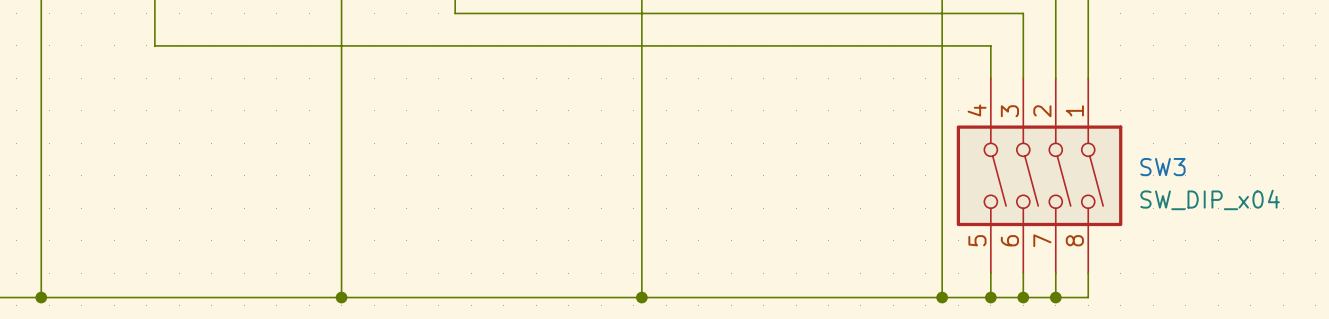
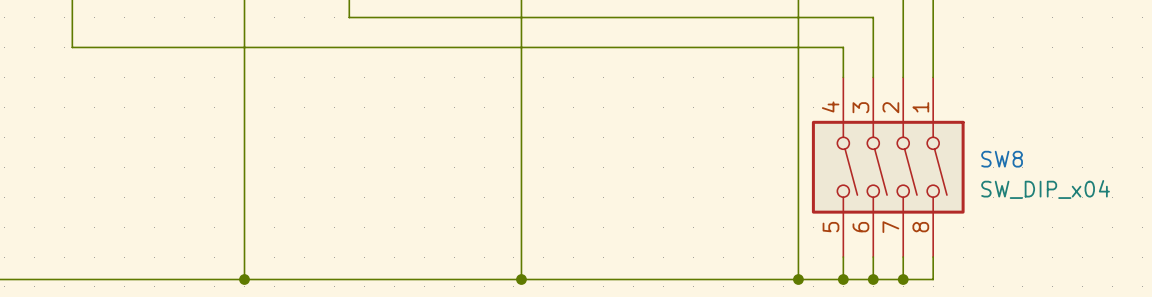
SW3 name: SW3 (1162, 167) -> SW8 (1002, 159)

